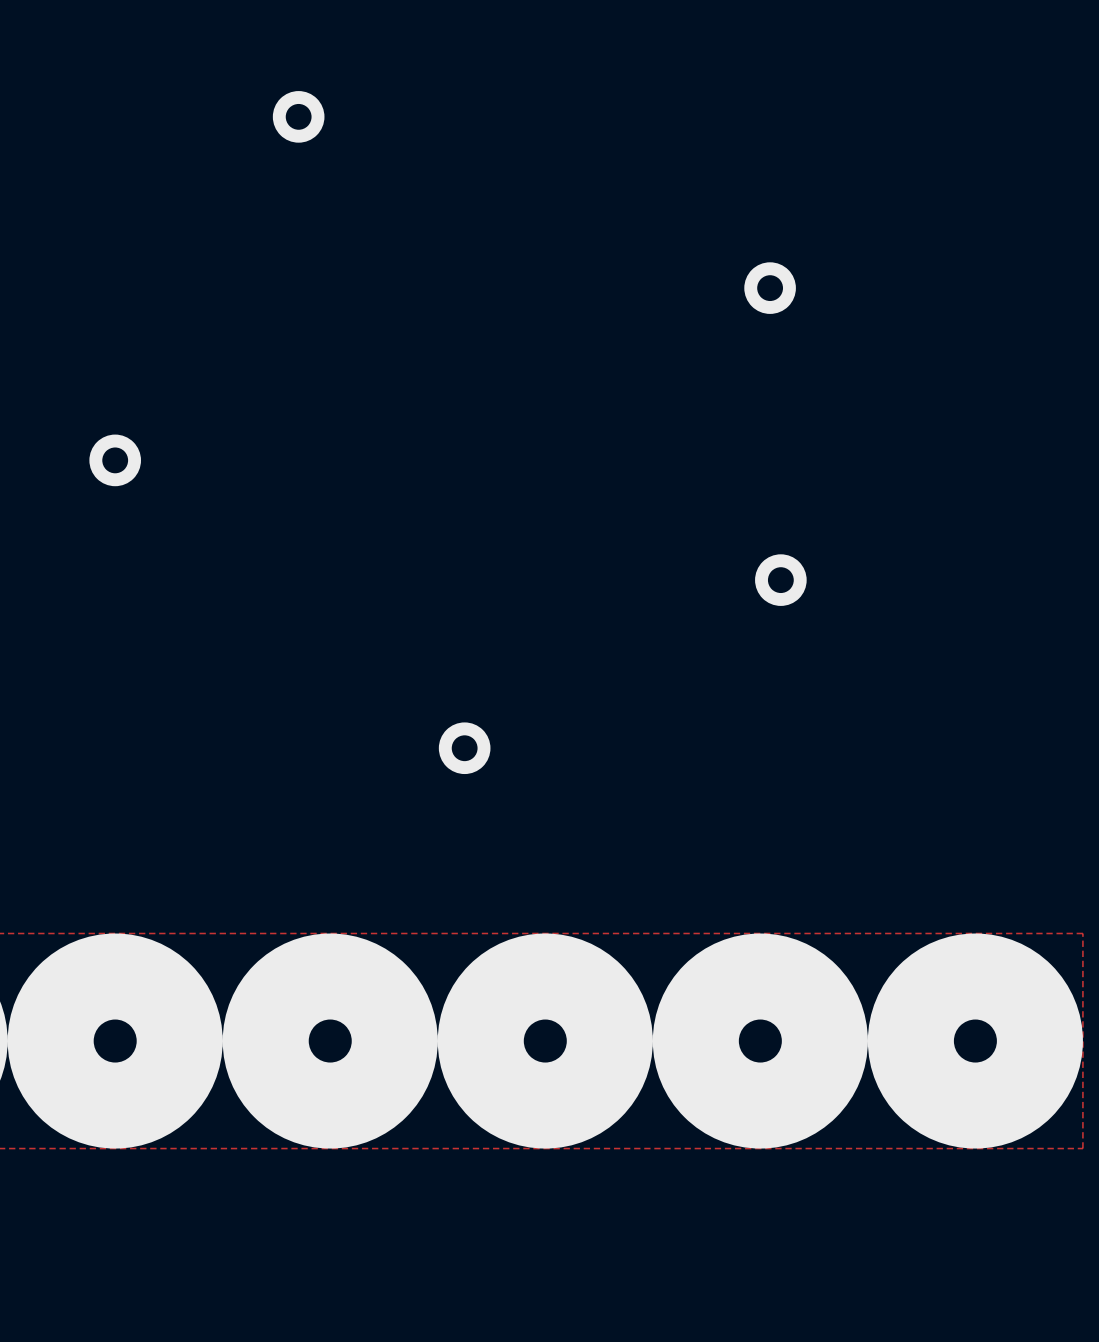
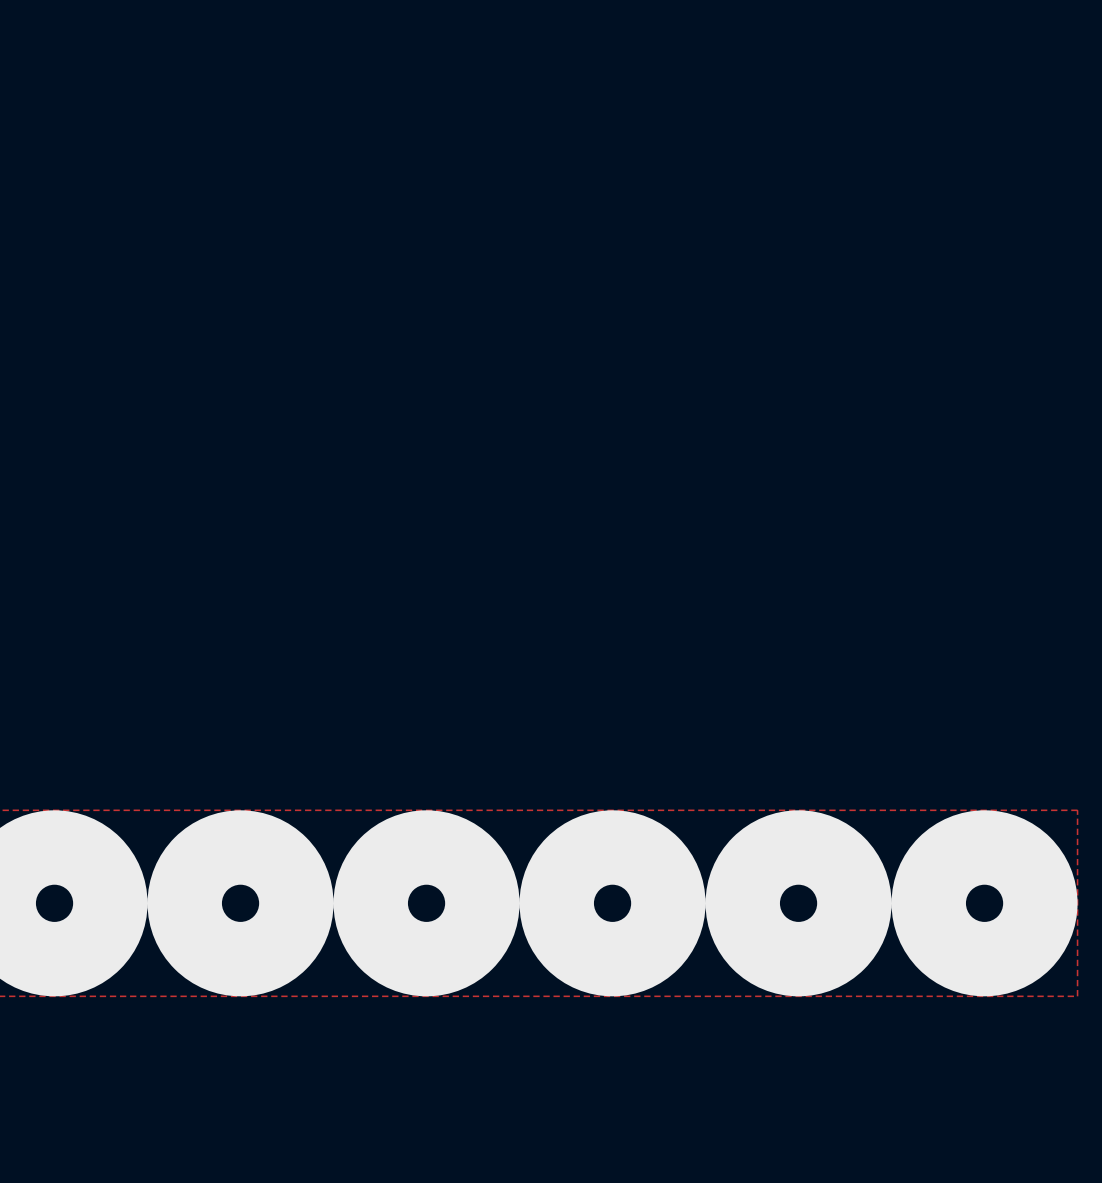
via: (298, 116) -> none
via: (770, 288) -> none
via: (115, 460) -> none
via: (780, 580) -> none
via: (464, 748) -> none

